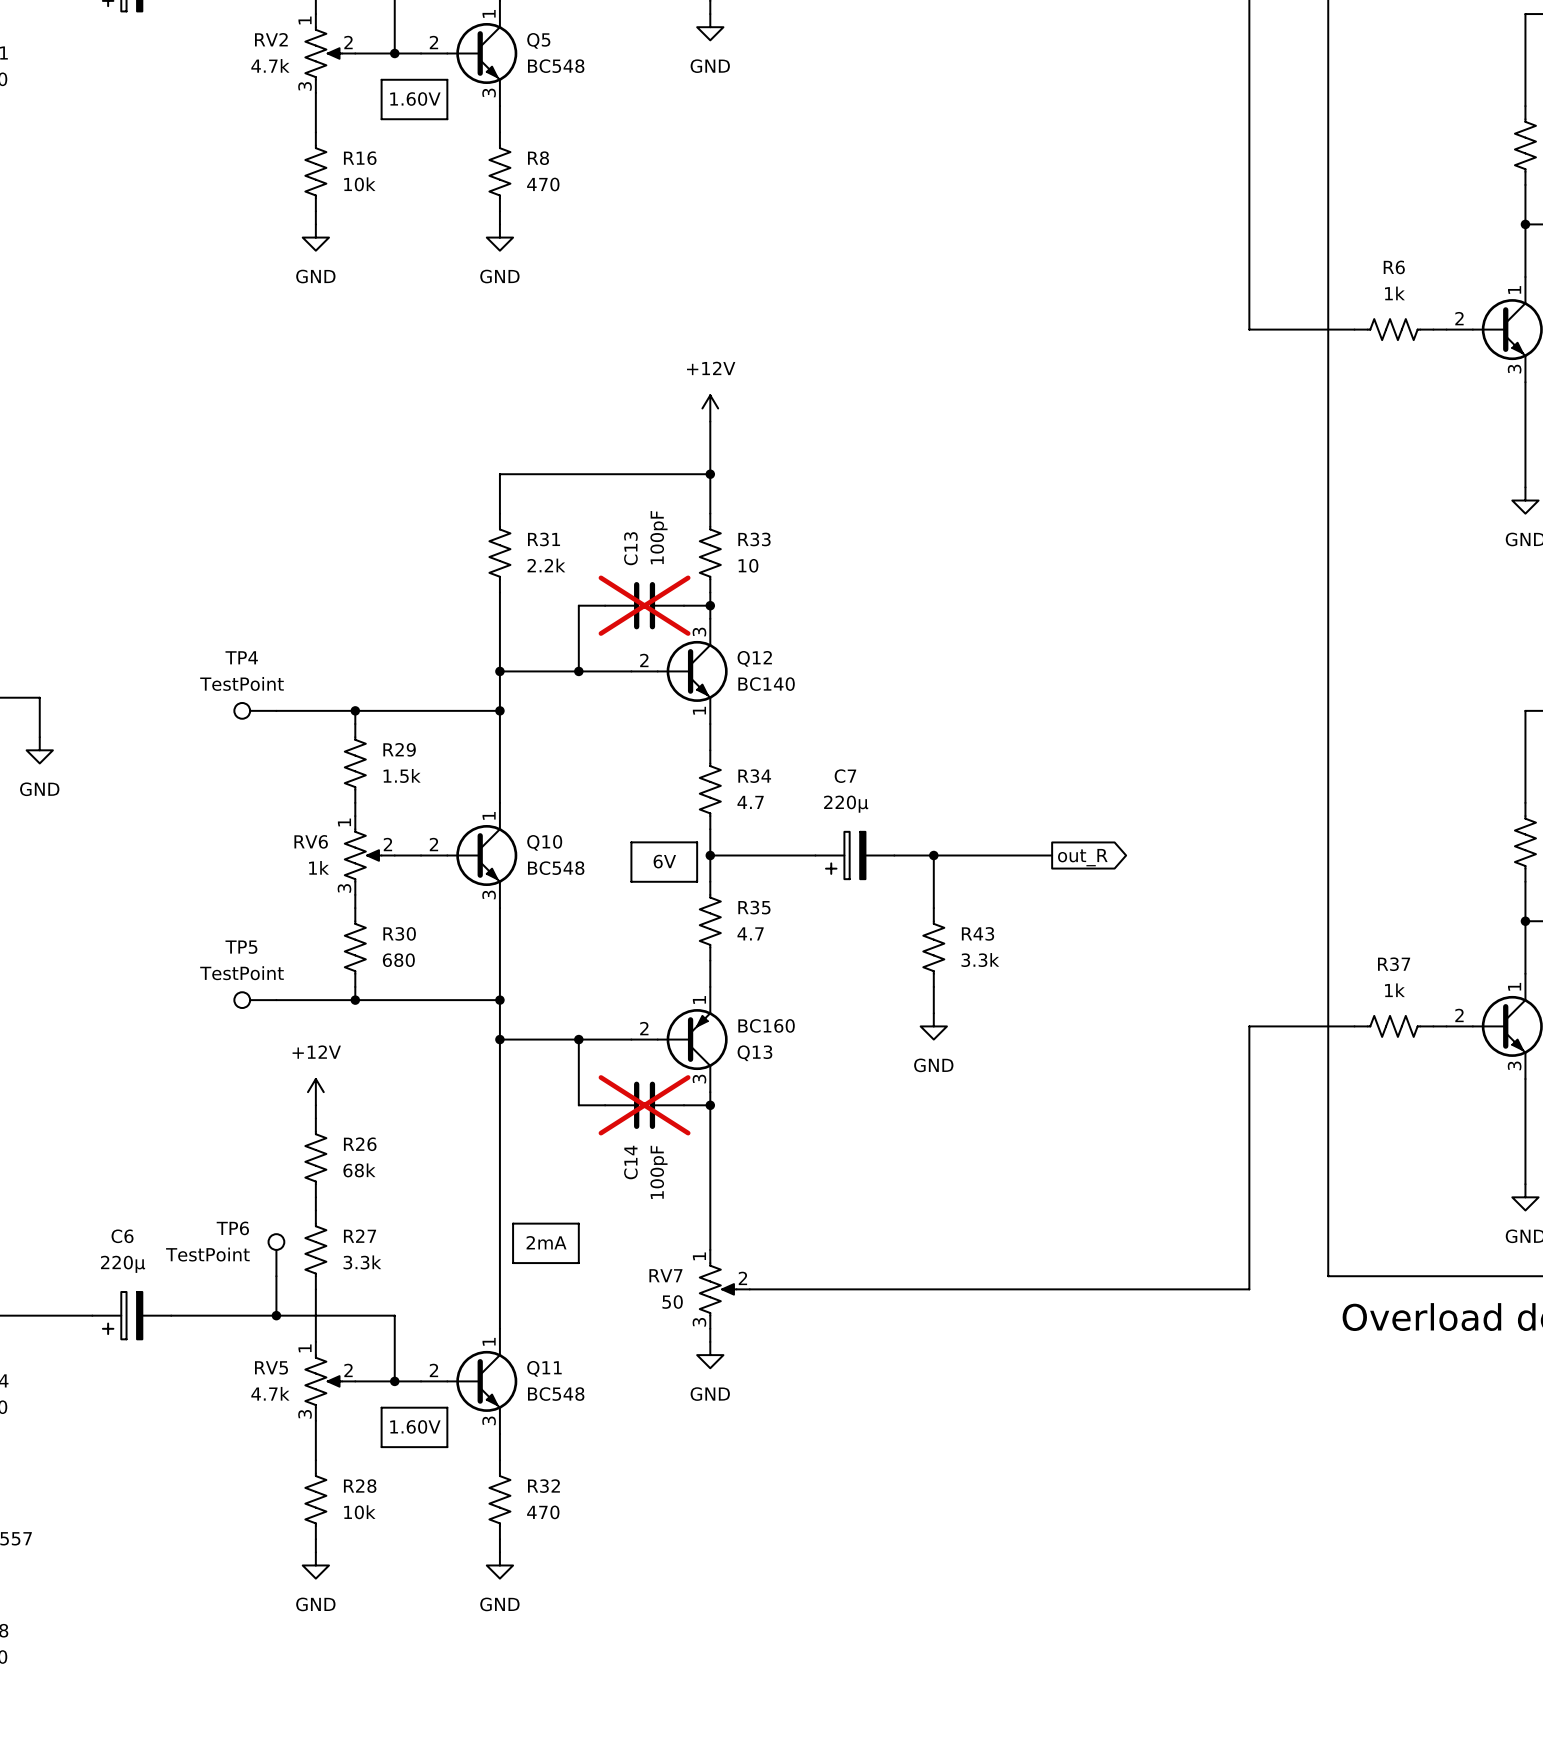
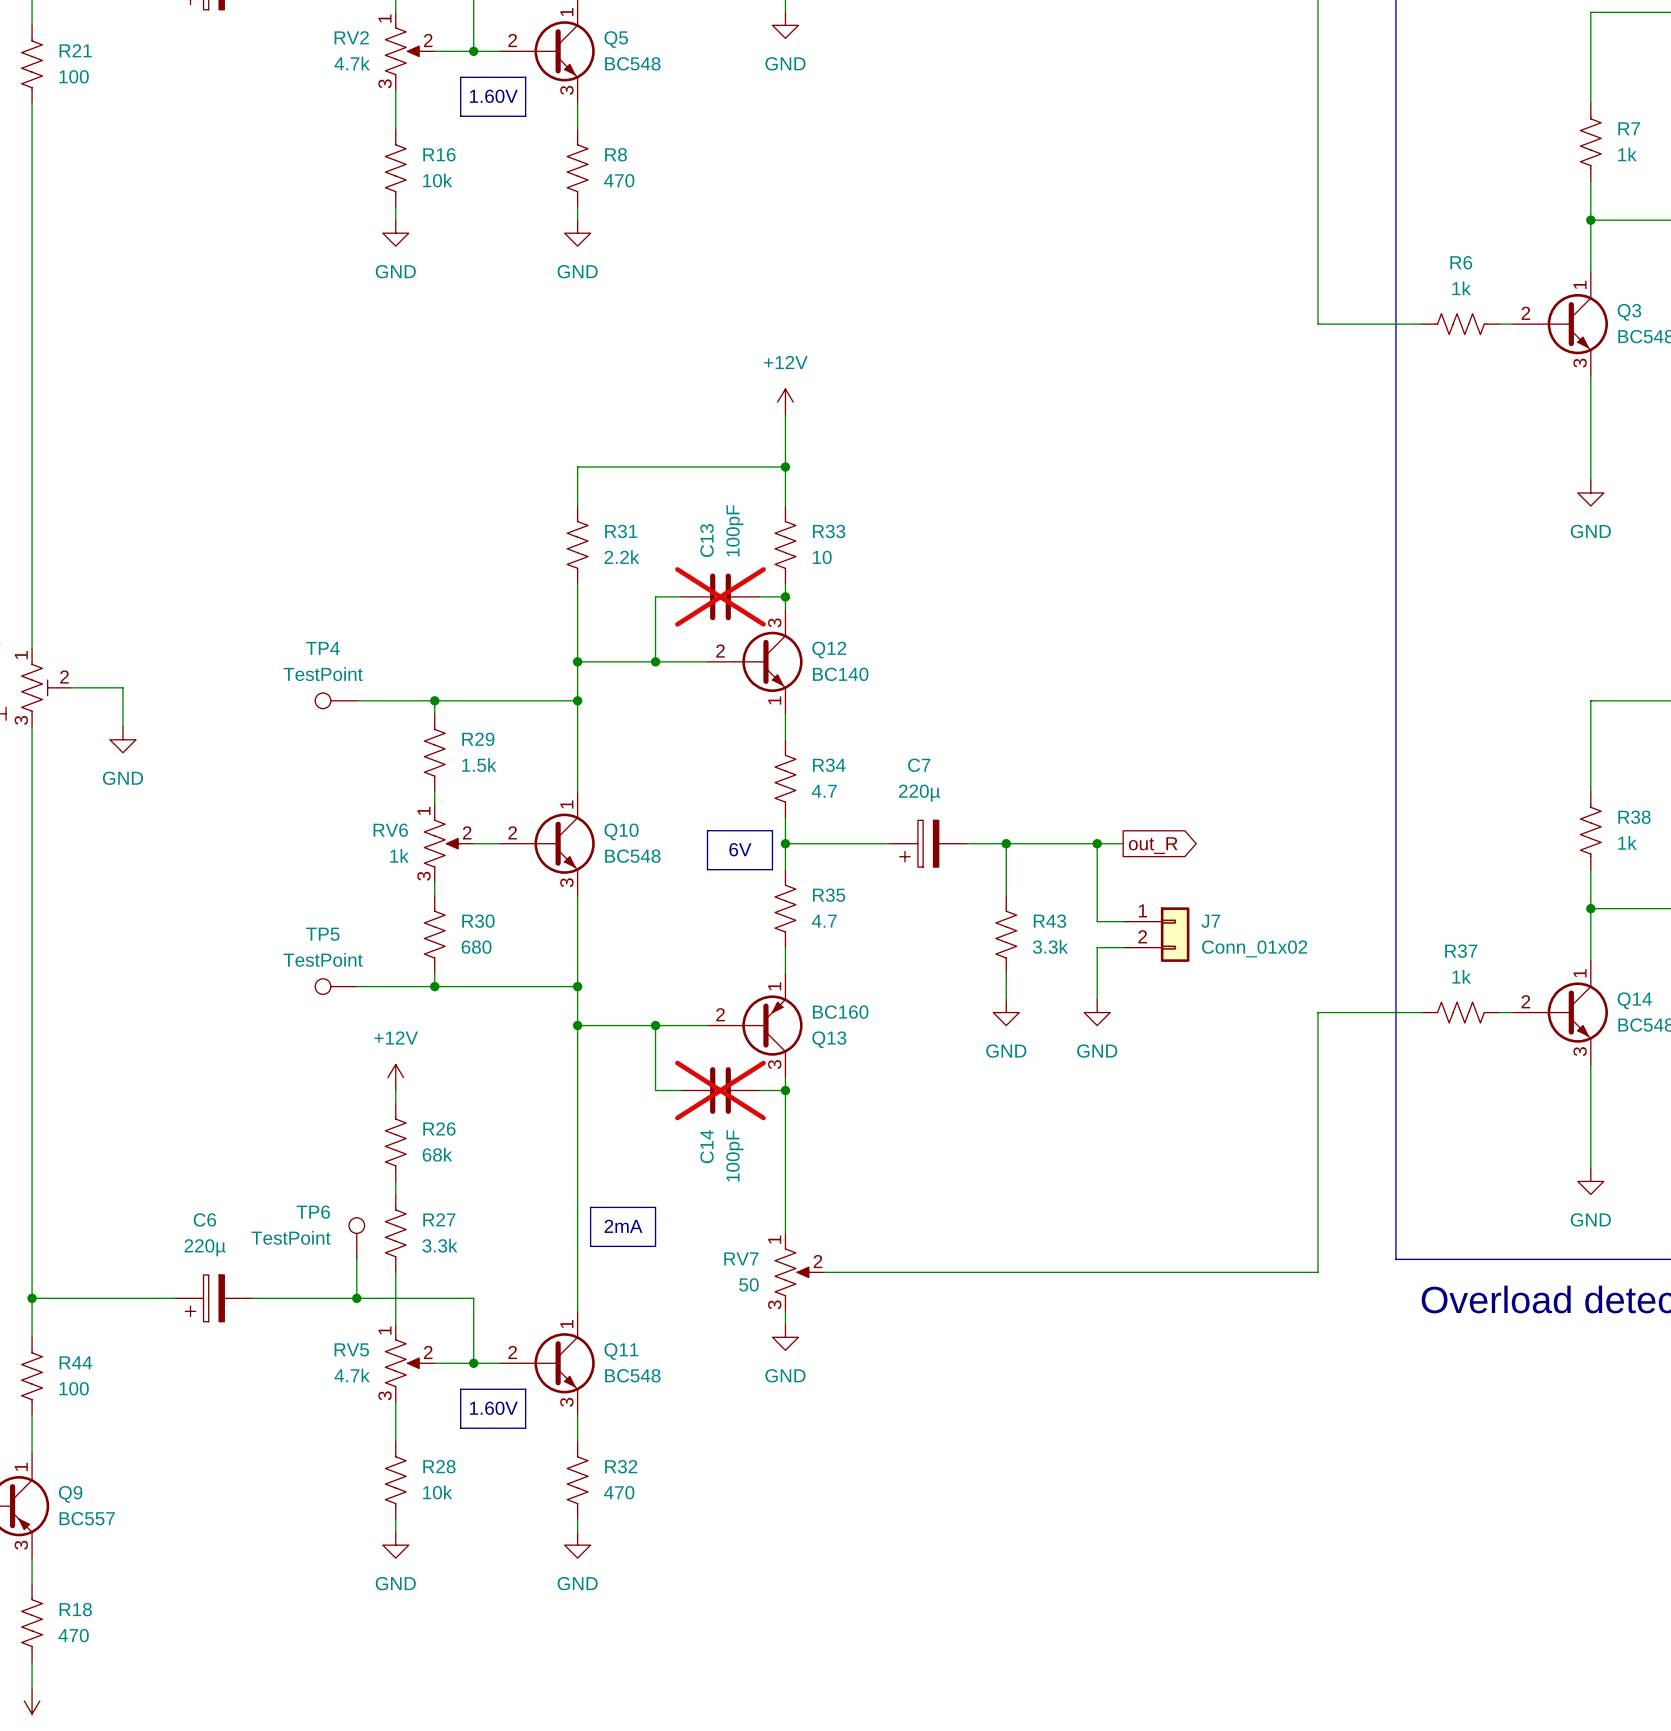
wire: none -> (1097, 843) (1097, 921) (1123, 921)
junction: none -> (1097, 843)
J7: none -> Conn_01x02 (1156, 934)
wire: none -> (1123, 947) (1097, 947) (1097, 999)
power symbol: none -> GND (1097, 1012)

